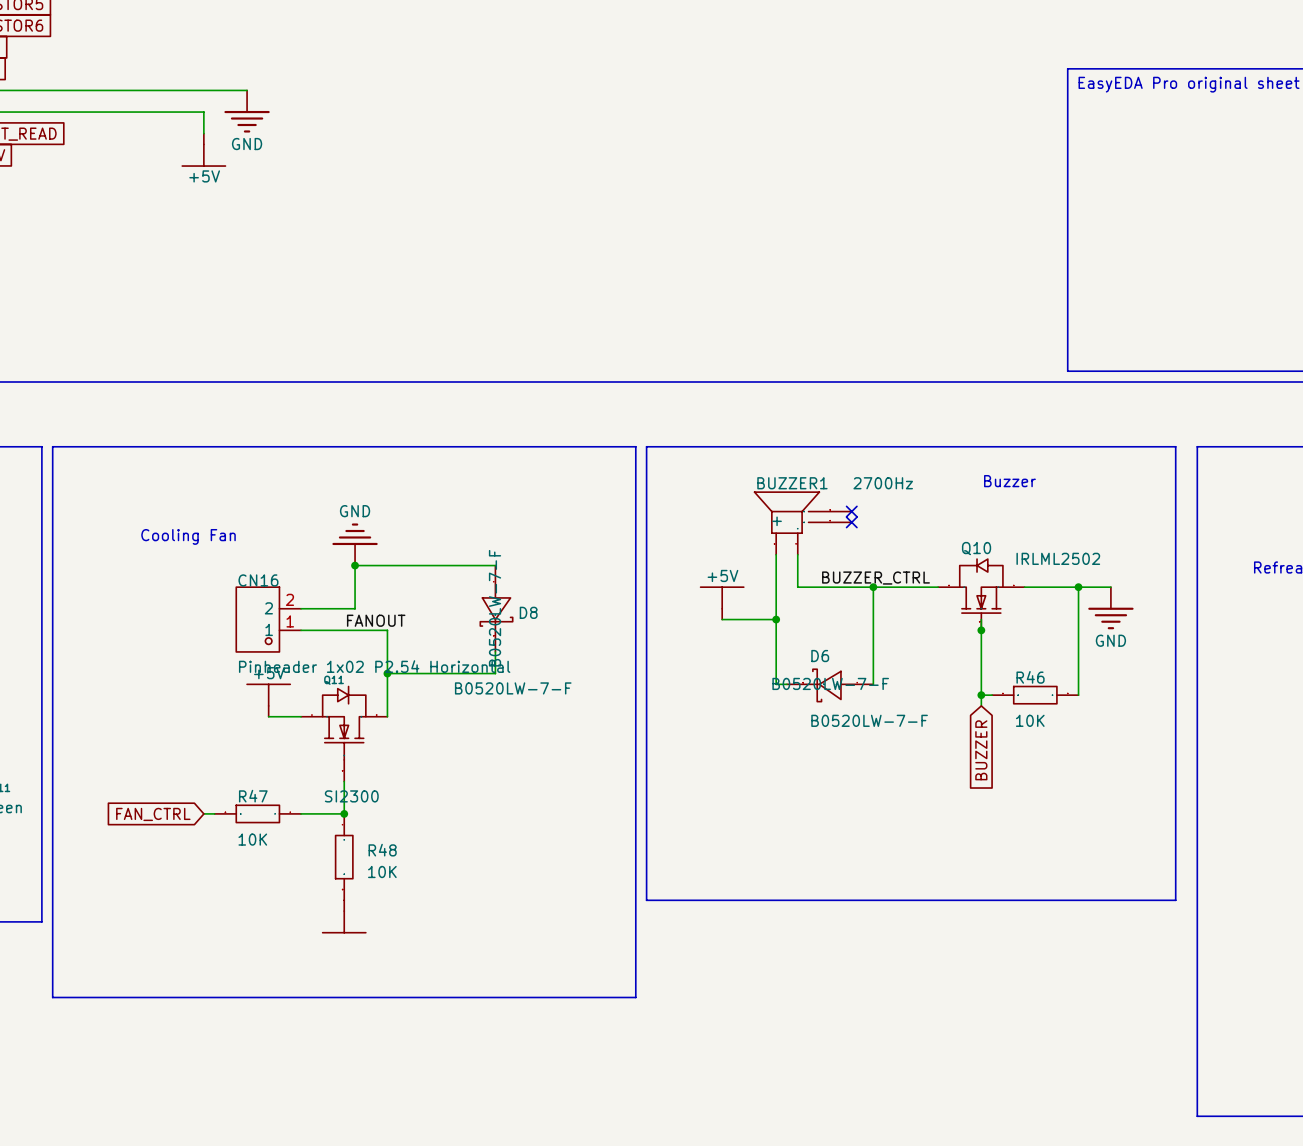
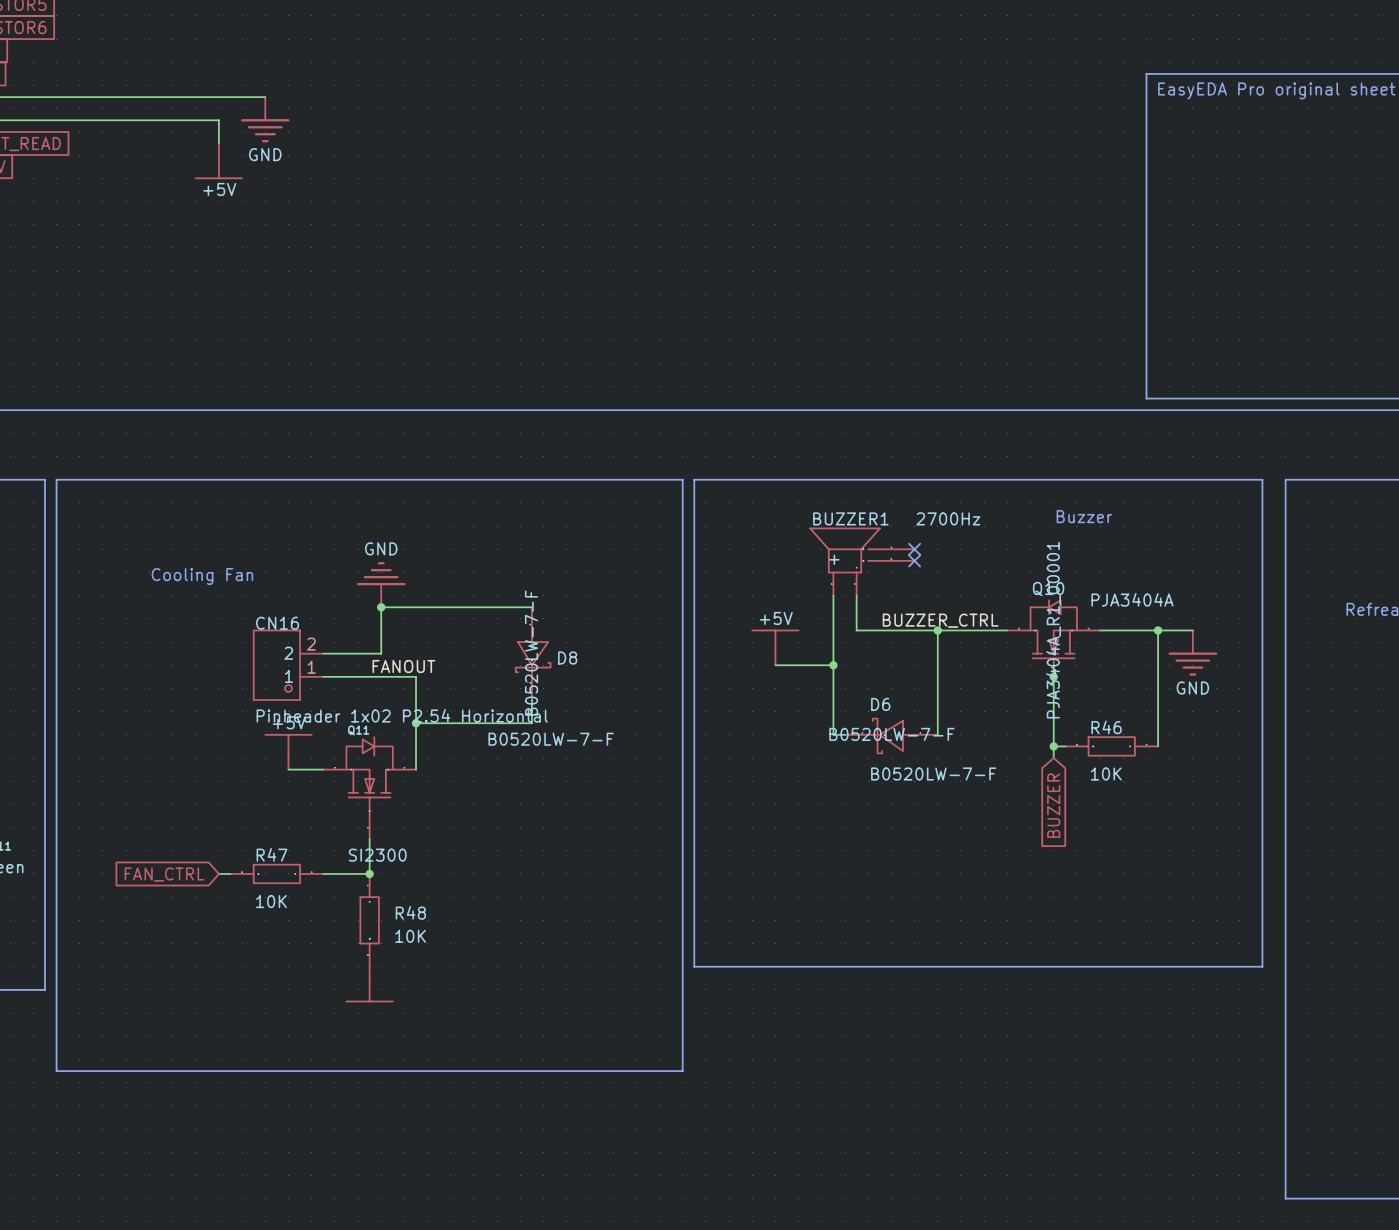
Q10 value: IRLML2502 (1058, 558) -> PJA3404A (1132, 599)
Q10 text: none -> PJA3404A_R1_00001 (1053, 630)

